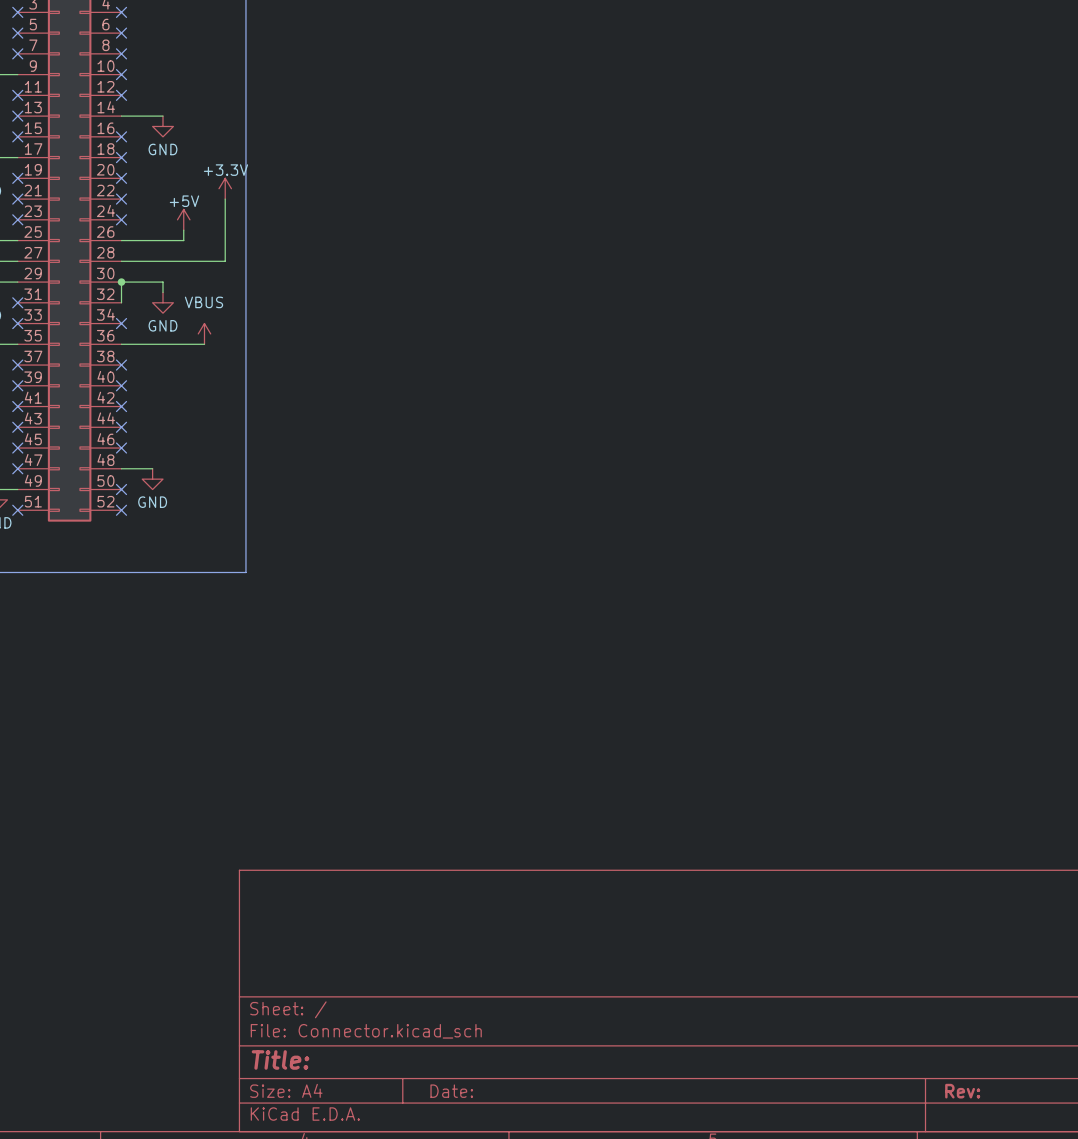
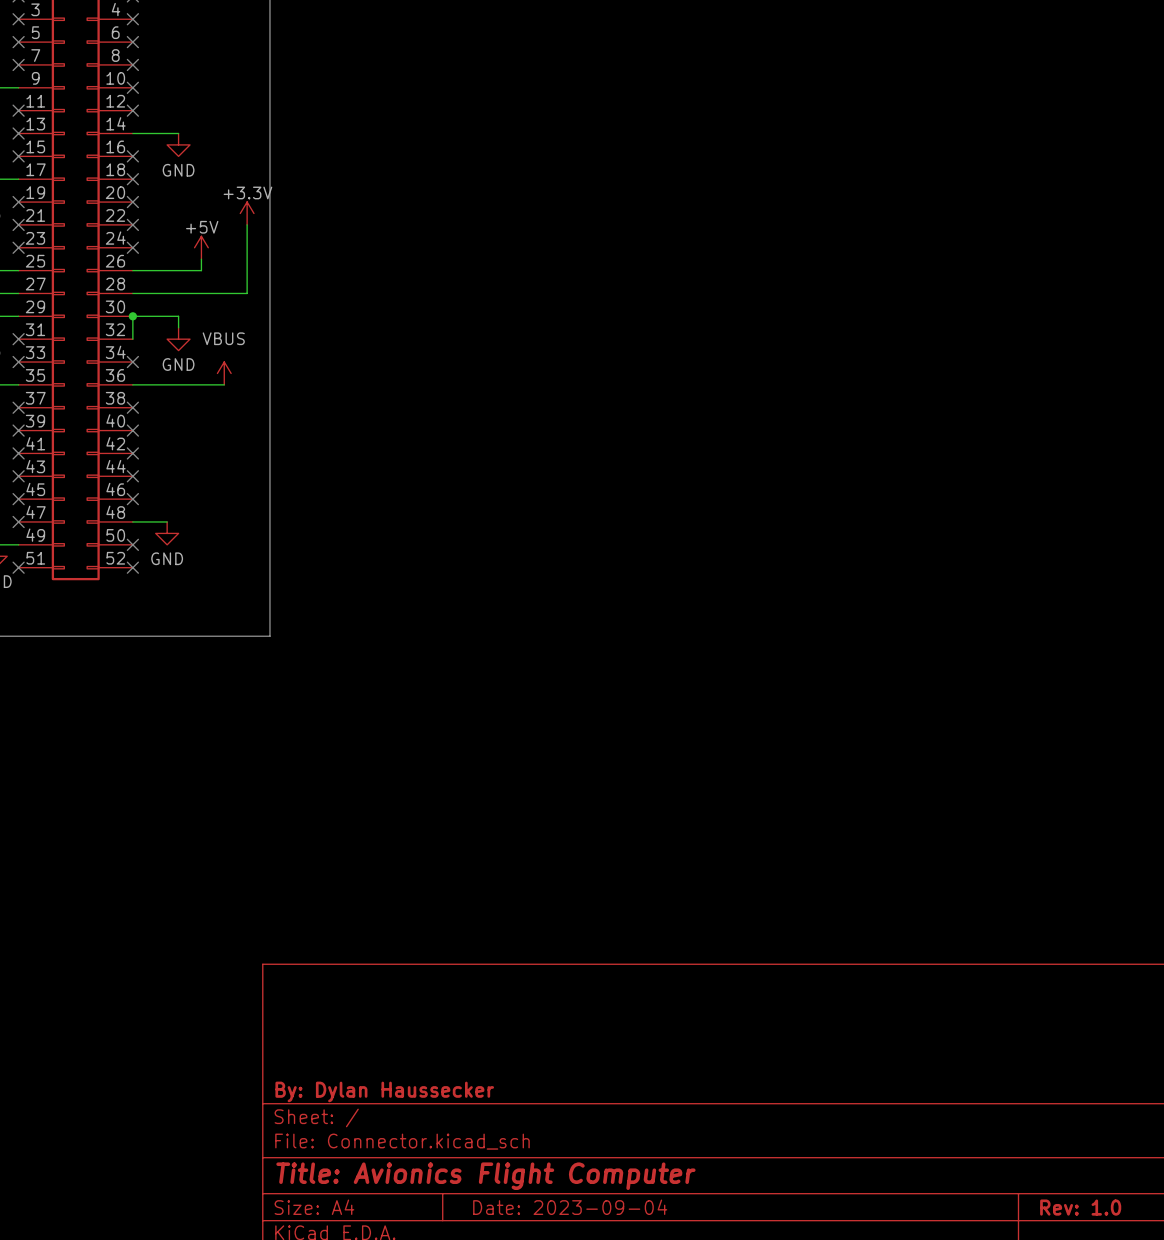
title block: none -> By: Dylan Haussecker (384, 1091)
title block: Title: (280, 1059) -> Title: Avionics Flight Computer (485, 1176)
title block: Date: (451, 1091) -> Date: 2023-09-04 (570, 1207)
title block: Rev: (962, 1091) -> Rev: 1.0 (1080, 1207)

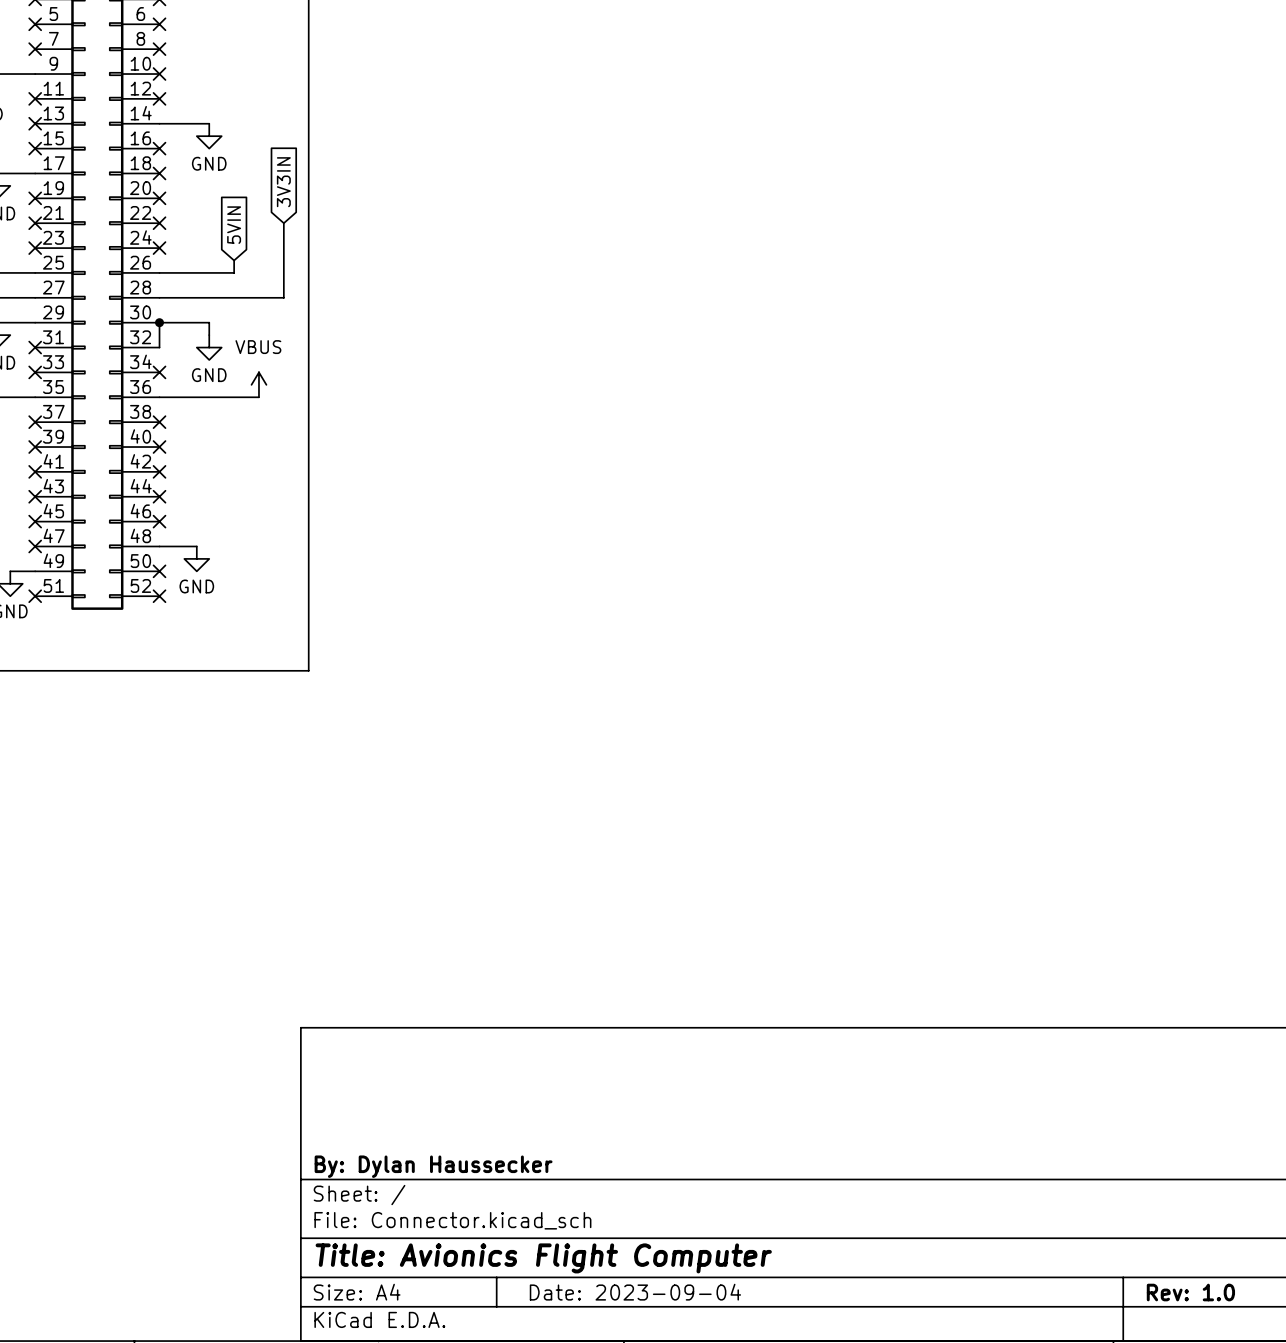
global label: none -> 3V3IN (283, 182)
power symbol: +3.3V (247, 213) -> none
global label: none -> 5VIN (234, 225)
power symbol: +5V (201, 247) -> none

